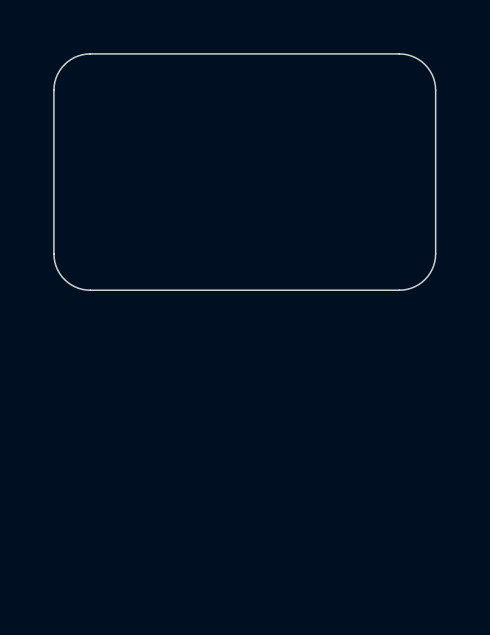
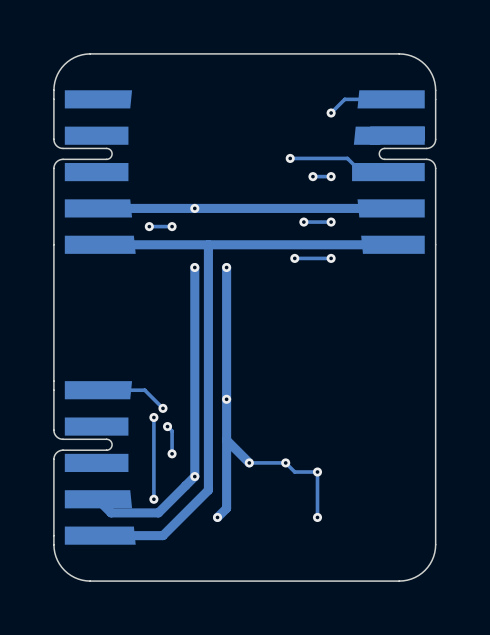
board edge: (53, 99) (53, 244) -> none
track: none -> (392, 99) (344, 99) (331, 112)
board edge: (435, 99) (435, 244) -> none
via: none -> (331, 112)
track: none -> (290, 158) (347, 158) (361, 172) (388, 172)
via: none -> (290, 158)
part: none -> (94, 172)
part: none -> (394, 172)
via: none -> (312, 176)
track: none -> (331, 176) (312, 176)
via: none -> (331, 176)
via: none -> (194, 208)
track: none -> (392, 208) (97, 208)
via: none -> (303, 222)
track: none -> (331, 222) (303, 222)
via: none -> (331, 222)
via: none -> (149, 226)
track: none -> (172, 226) (149, 226)
via: none -> (172, 226)
track: none -> (208, 244) (208, 490) (162, 535) (99, 535)
track: none -> (393, 244) (99, 244)
board edge: none -> (53, 253) (53, 390)
board edge: (435, 253) (432, 269) (425, 279) (411, 288) (399, 290) (86, 290) (74, 286) (61, 276) (55, 265) (53, 253) -> (435, 253) (435, 544) (432, 560) (421, 573) (411, 579) (399, 581) (86, 580) (74, 577) (61, 567) (54, 552) (53, 535)
via: none -> (294, 258)
track: none -> (331, 258) (294, 258)
via: none -> (331, 258)
track: none -> (194, 267) (194, 476) (158, 512) (111, 512) (97, 499)
via: none -> (194, 267)
track: none -> (226, 267) (226, 508) (217, 517)
via: none -> (226, 267)
track: none -> (97, 390) (144, 390) (162, 408)
via: none -> (226, 399)
via: none -> (162, 408)
track: none -> (153, 417) (153, 499)
via: none -> (153, 417)
track: none -> (167, 426) (172, 431) (172, 453)
via: none -> (167, 426)
track: none -> (226, 440) (249, 462) (285, 462) (294, 472) (317, 472) (317, 517)
via: none -> (172, 453)
part: none -> (94, 462)
via: none -> (249, 462)
via: none -> (285, 462)
via: none -> (317, 472)
via: none -> (194, 476)
via: none -> (153, 499)
via: none -> (217, 517)
via: none -> (317, 517)

